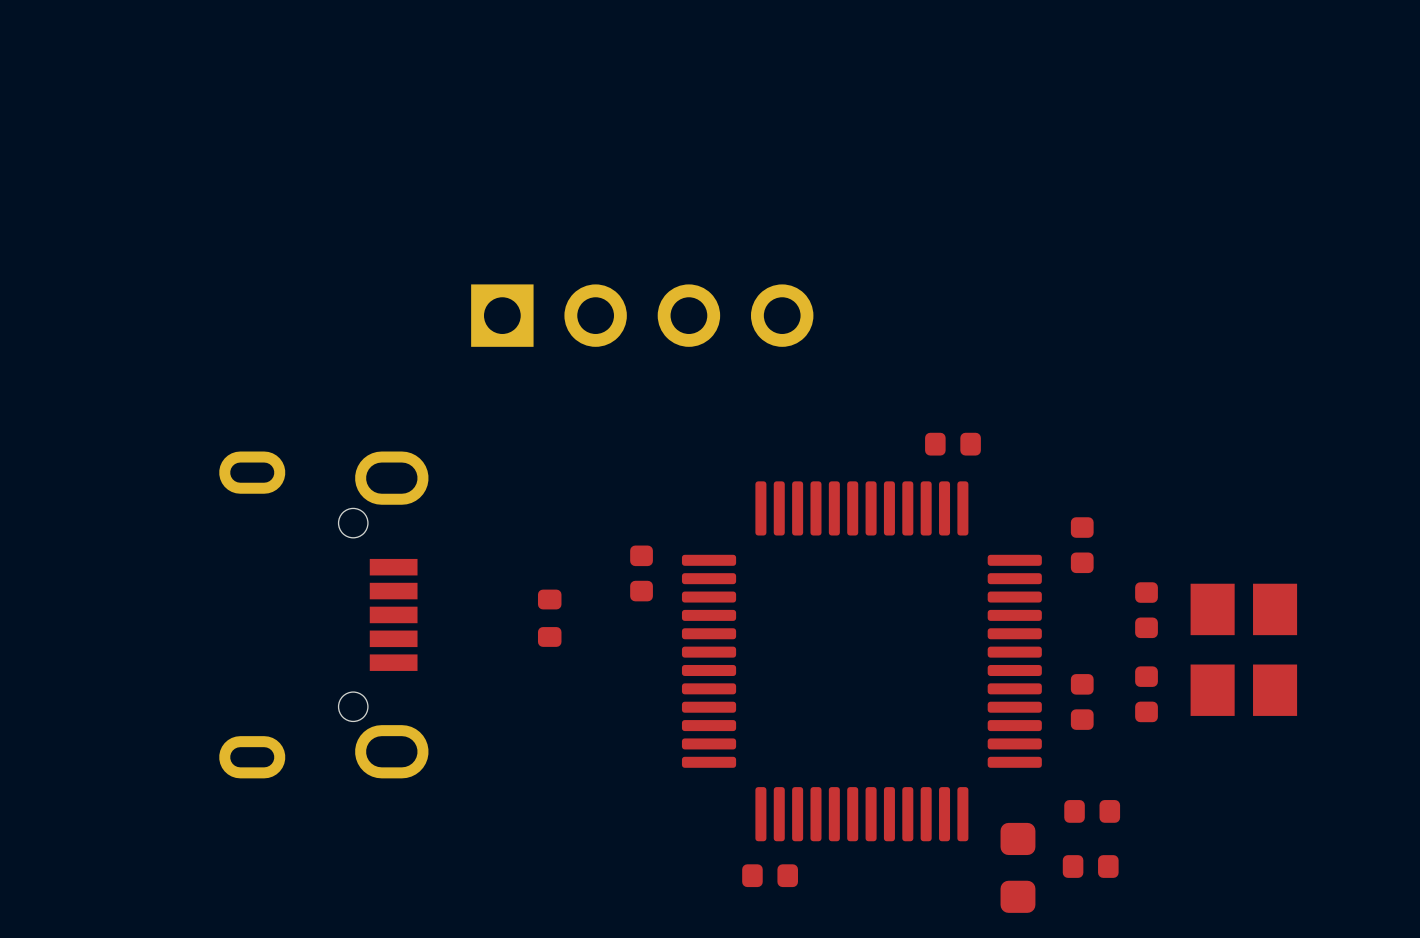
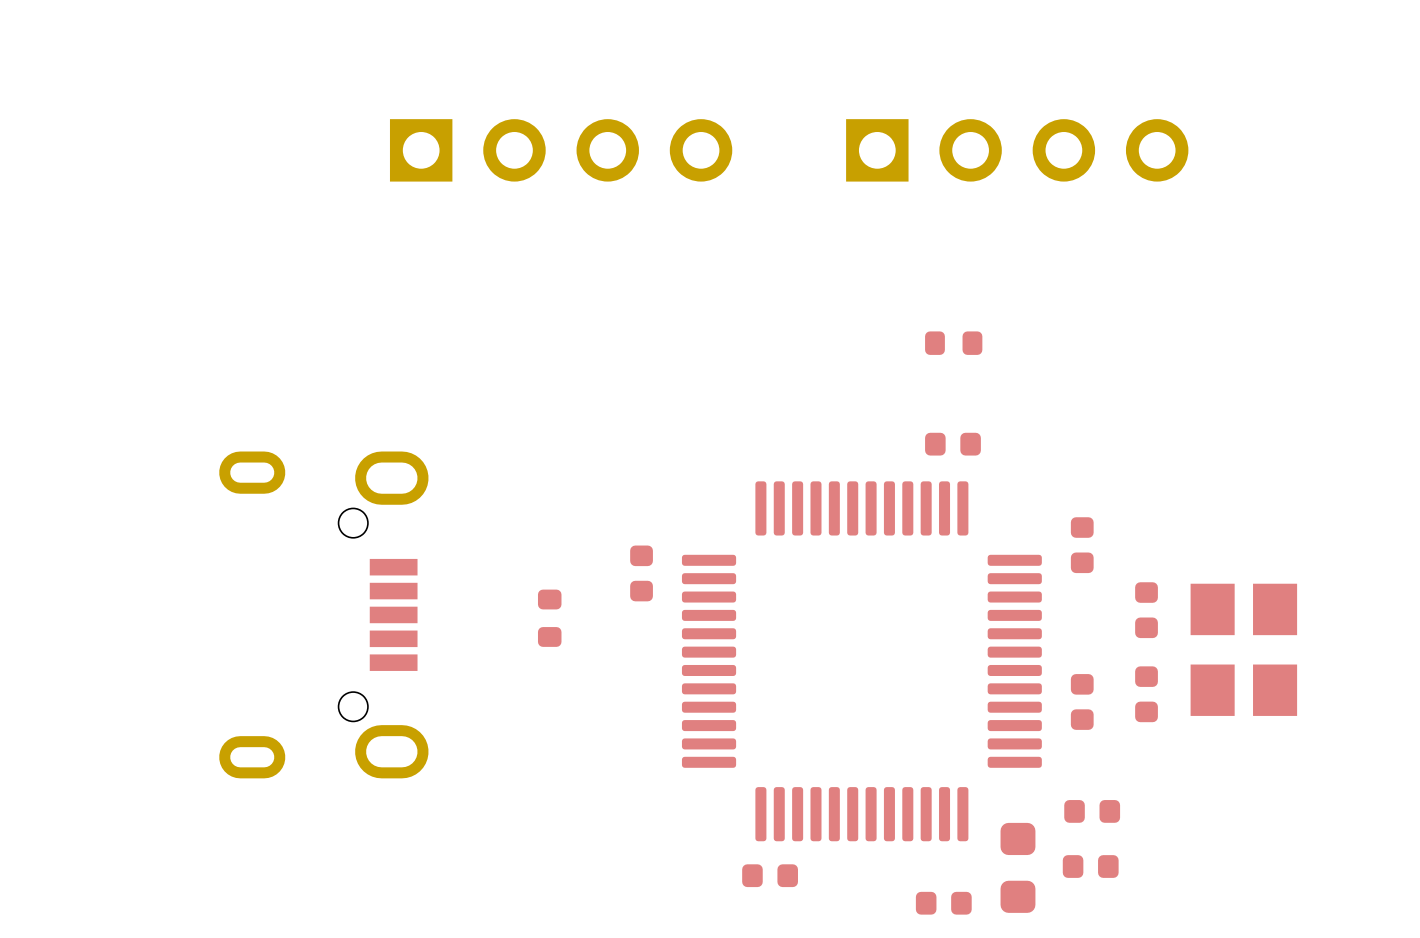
part: none -> (1017, 150)
part position: (642, 315) -> (561, 150)
part: none -> (953, 343)
part: none -> (943, 903)

